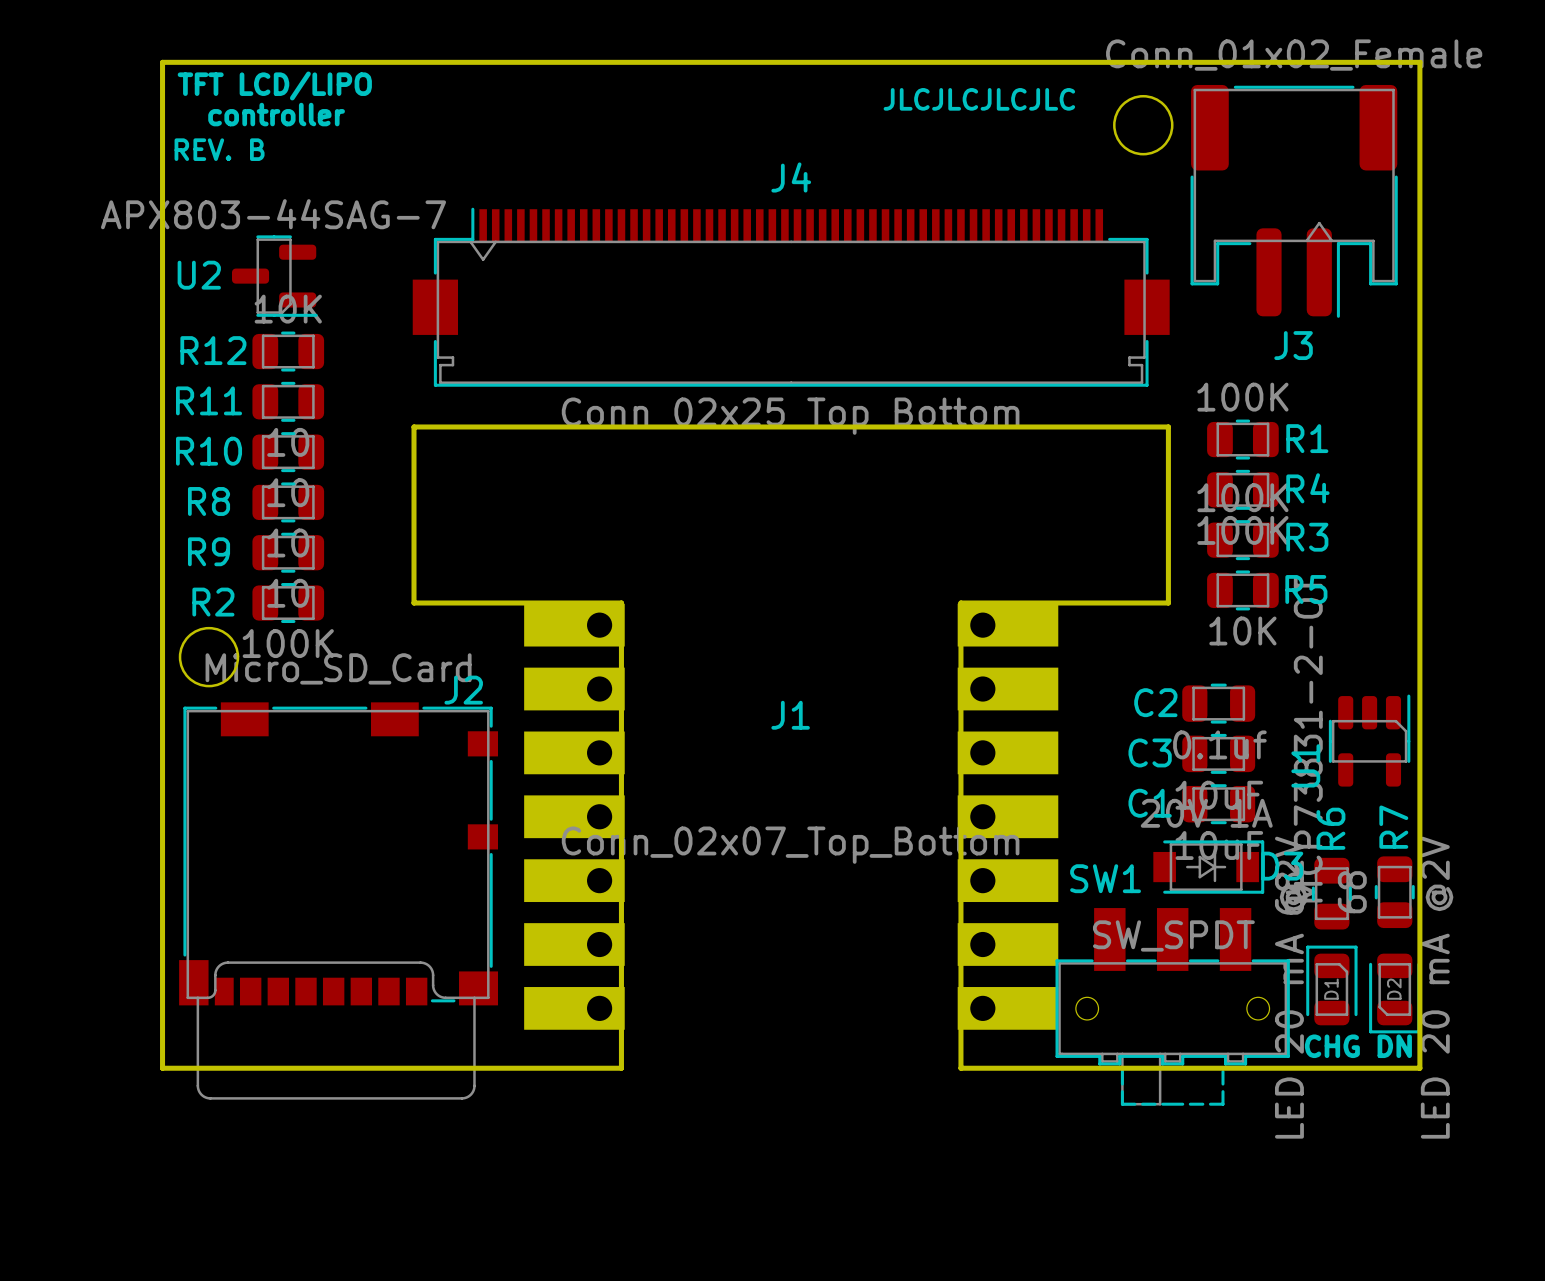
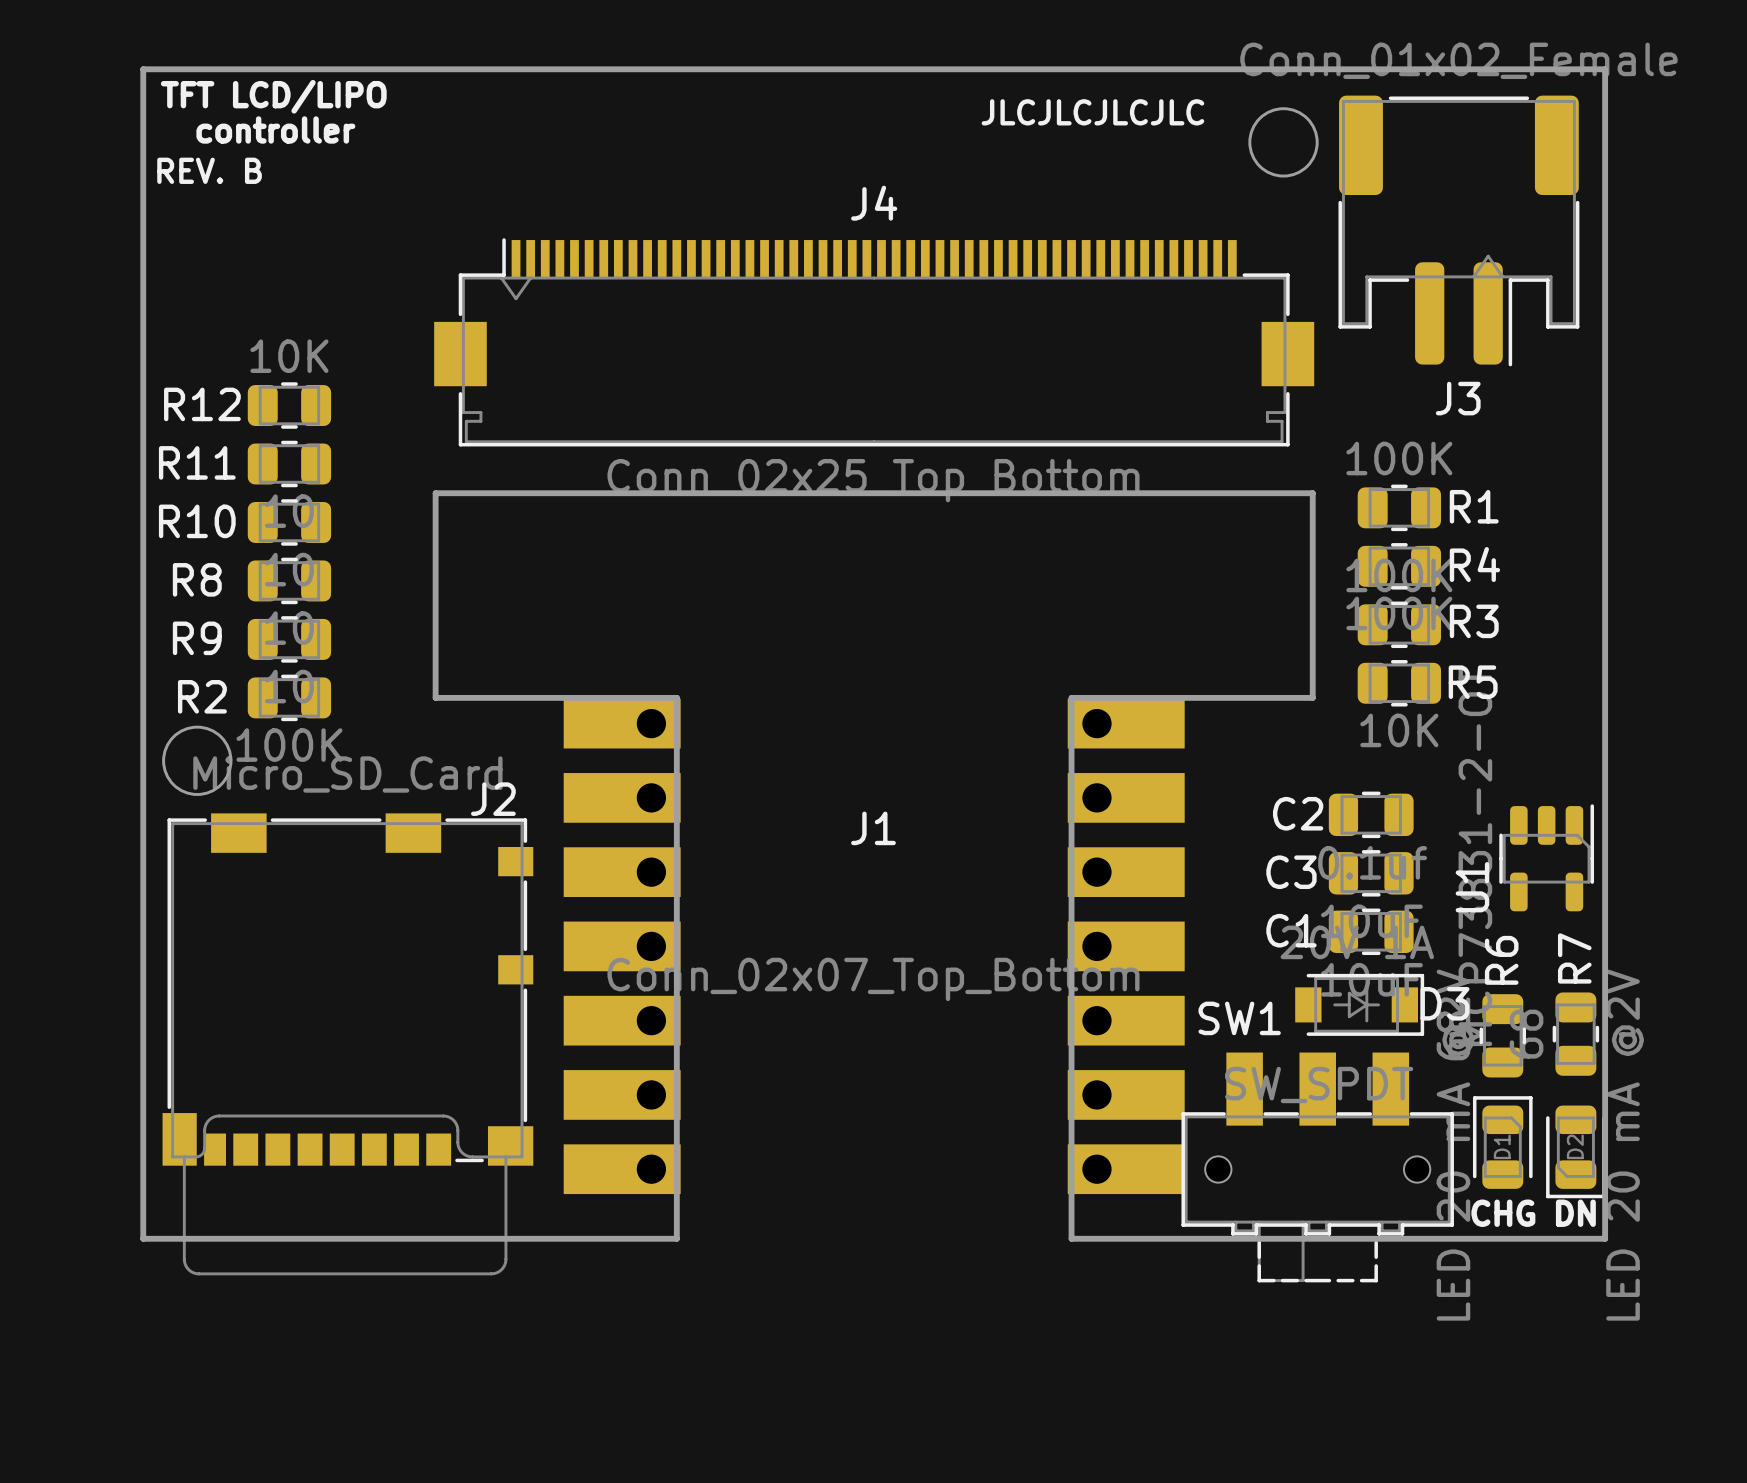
U2: APX803-44SAG-7 (274, 276) -> none

